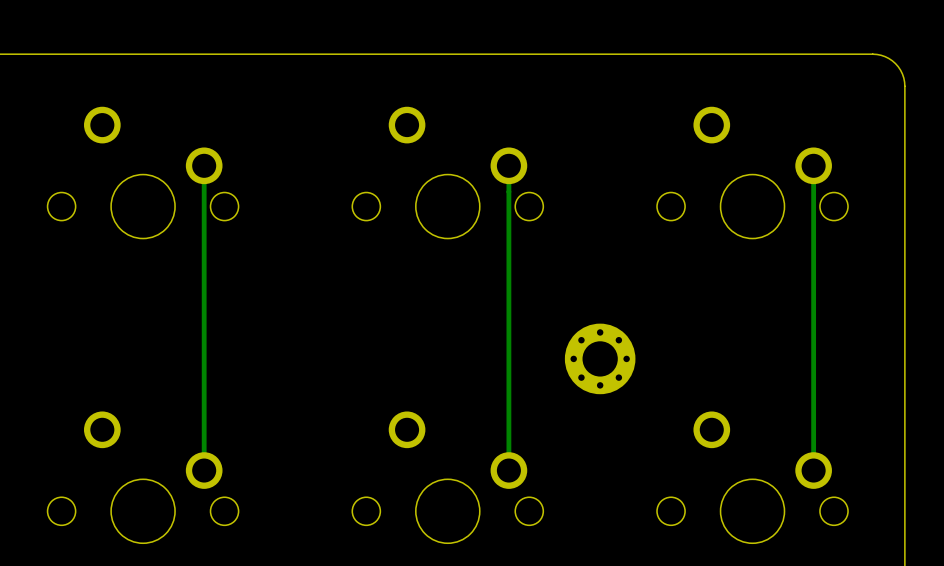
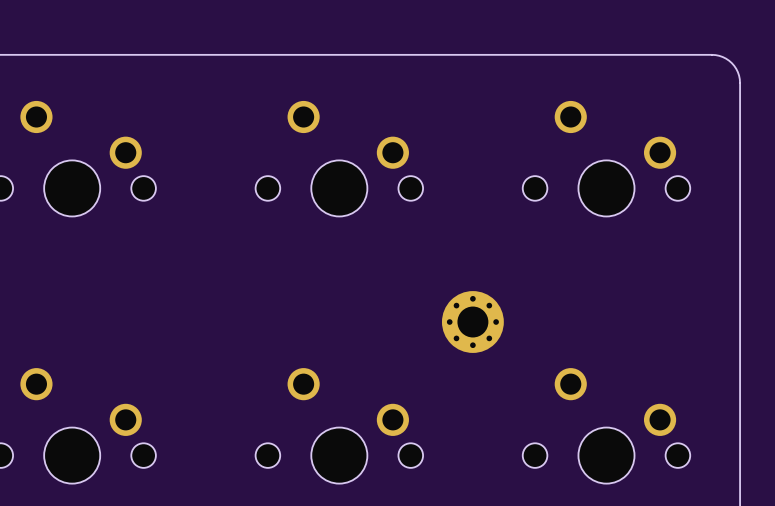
track: (204, 165) (204, 470) -> none
track: (508, 165) (508, 470) -> none
track: (813, 165) (813, 470) -> none

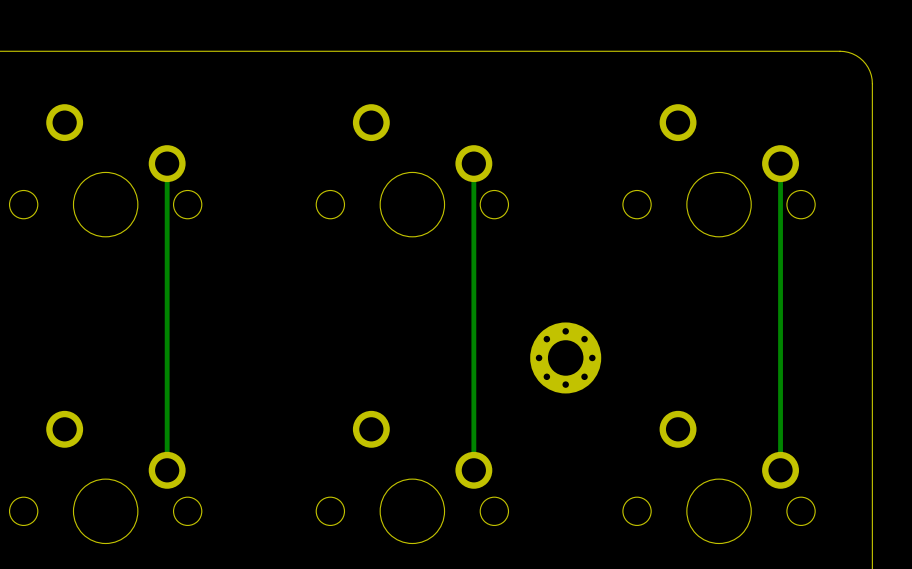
track: none -> (167, 163) (167, 470)
track: none -> (473, 163) (473, 470)
track: none -> (780, 163) (780, 470)

